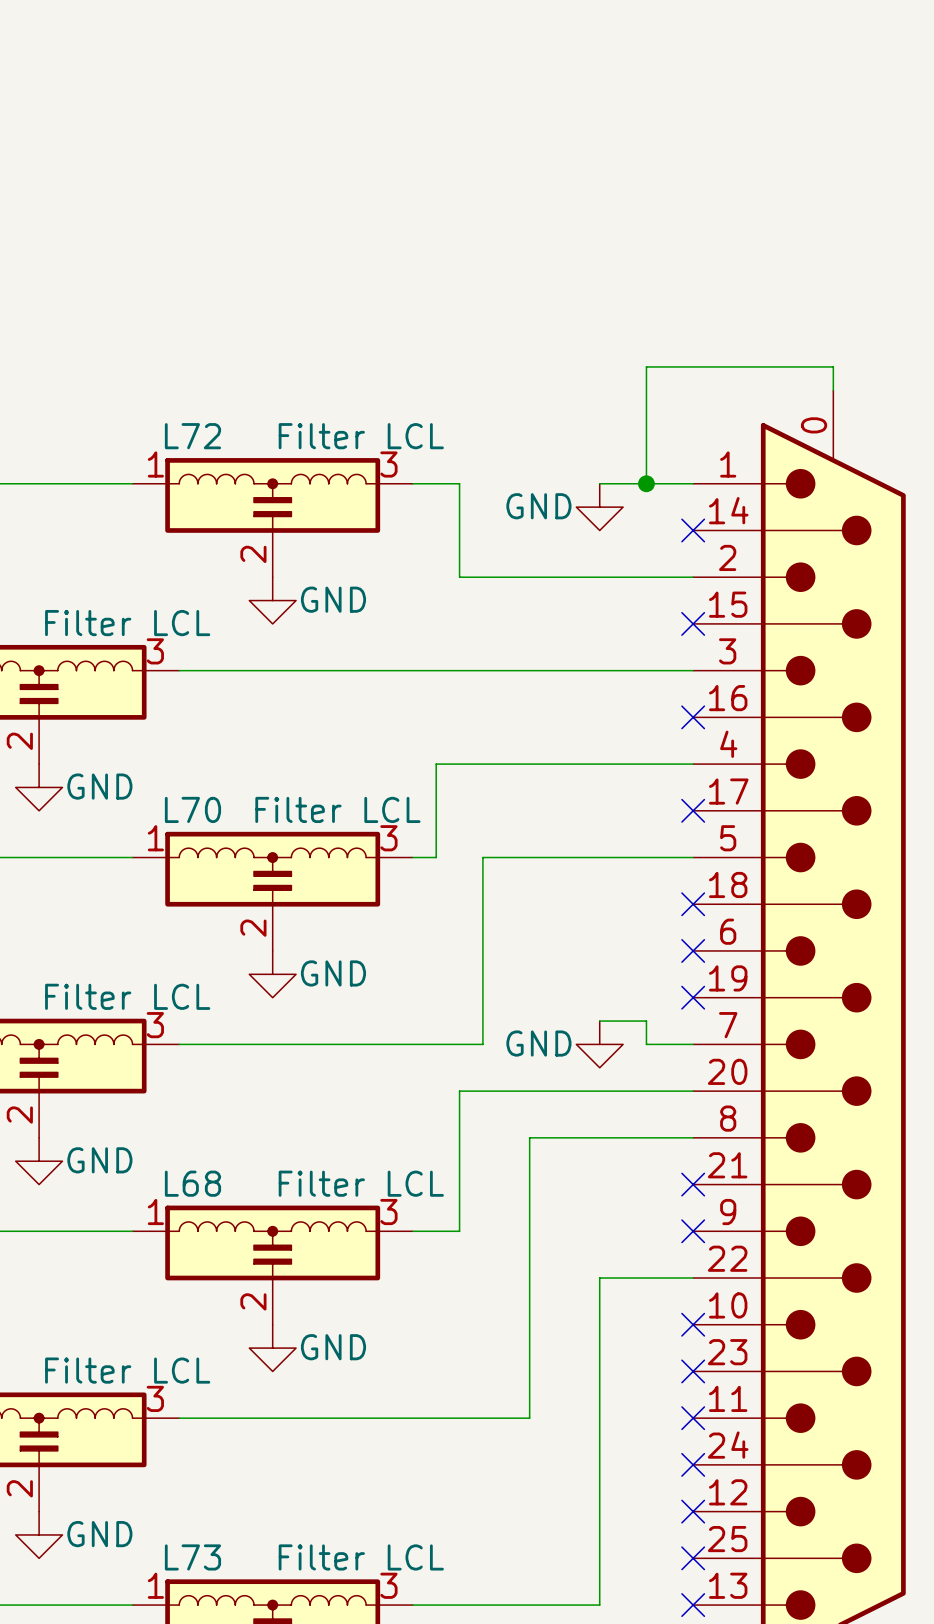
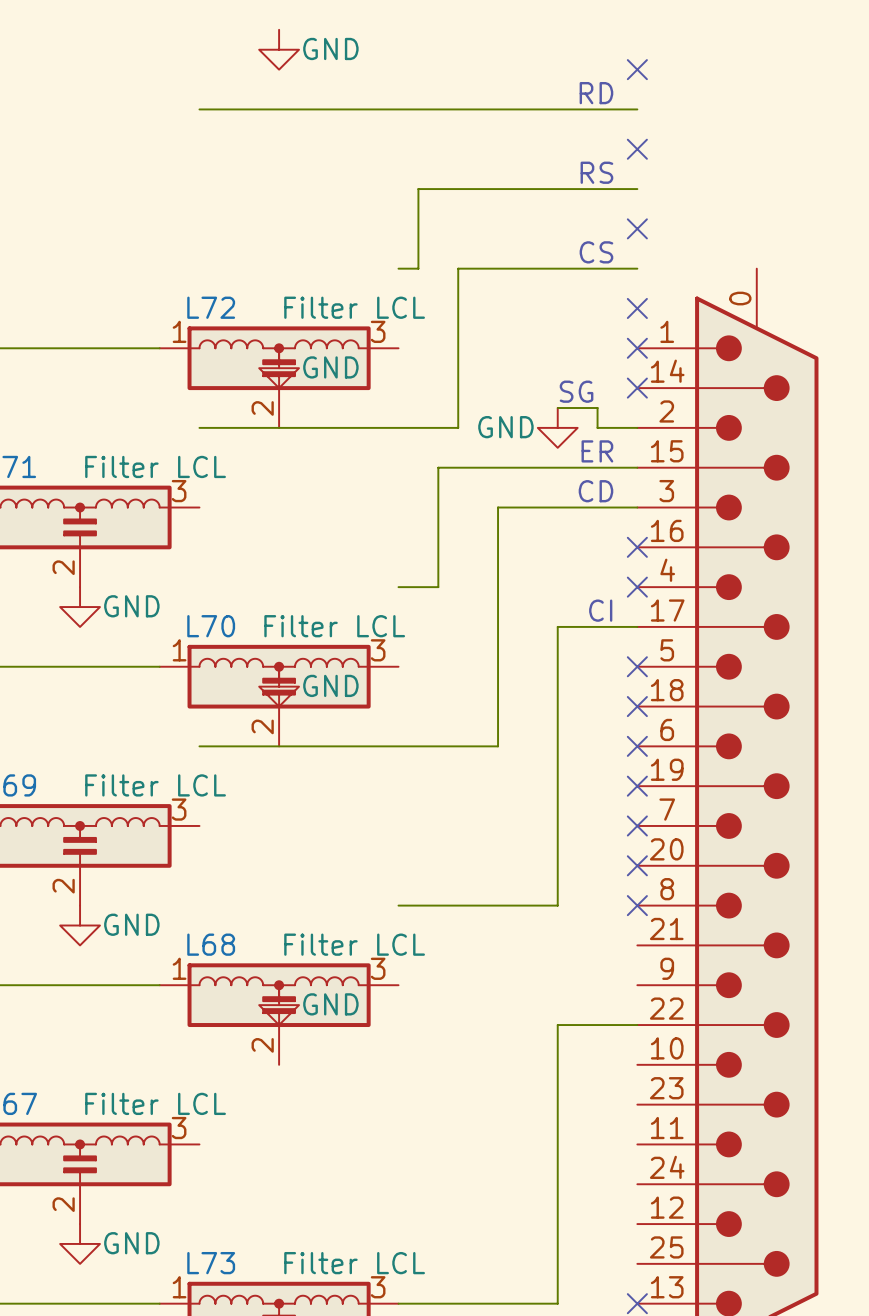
power symbol: none -> GND (279, 49)
no-connect mark: none -> (637, 69)
text: none -> RD (596, 93)
wire: none -> (199, 109) (637, 109)
no-connect mark: none -> (637, 149)
text: none -> RS (596, 172)
wire: none -> (637, 189) (418, 189) (418, 268) (398, 268)
no-connect mark: none -> (637, 228)
text: none -> CS (596, 252)
wire: none -> (637, 268) (458, 268) (458, 427)
wire: (833, 390) (833, 366) (646, 366) (646, 483) -> none
no-connect mark: none -> (637, 308)
wire: (412, 483) (459, 483) (459, 577) -> (199, 427) (438, 427)
wire: (599, 483) (693, 483) -> none
junction: (646, 483) -> none
no-connect mark: none -> (637, 348)
power symbol position: GND (599, 507) -> GND (557, 427)
text: none -> SG (576, 391)
wire: (482, 577) (646, 577) -> (557, 408) (597, 408) (597, 427)
power symbol position: GND (272, 600) -> GND (279, 368)
text: none -> ER (597, 451)
no-connect mark: (693, 623) -> none
text: none -> CD (595, 491)
wire: (179, 670) (529, 670) -> (199, 746) (498, 746) (498, 507)
wire: (436, 764) (436, 857) (412, 857) -> (418, 587) (398, 587)
wire: (459, 764) (693, 764) -> (438, 587) (438, 467) (637, 467)
no-connect mark: none -> (637, 587)
text: none -> CI (600, 610)
no-connect mark: (693, 810) -> none
wire: (693, 857) (482, 857) (482, 1044) (179, 1044) -> none
no-connect mark: none -> (637, 666)
power symbol position: GND (272, 974) -> GND (279, 686)
wire: (599, 1021) (646, 1021) (646, 1044) (693, 1044) -> none
power symbol: GND (599, 1044) -> none
no-connect mark: none -> (637, 825)
wire: (693, 1091) (459, 1091) (459, 1231) (412, 1231) -> none
no-connect mark: none -> (637, 865)
wire: (529, 1137) (529, 1418) (179, 1418) -> (498, 905) (398, 905)
wire: (599, 1137) (693, 1137) -> (557, 905) (557, 626) (637, 626)
no-connect mark: none -> (637, 905)
no-connect mark: (693, 1184) -> none
no-connect mark: (693, 1231) -> none
no-connect mark: (693, 1324) -> none
power symbol position: GND (272, 1348) -> GND (279, 1005)
no-connect mark: (693, 1371) -> none
no-connect mark: (693, 1418) -> none
no-connect mark: (693, 1464) -> none
no-connect mark: (693, 1511) -> none
no-connect mark: (693, 1558) -> none

